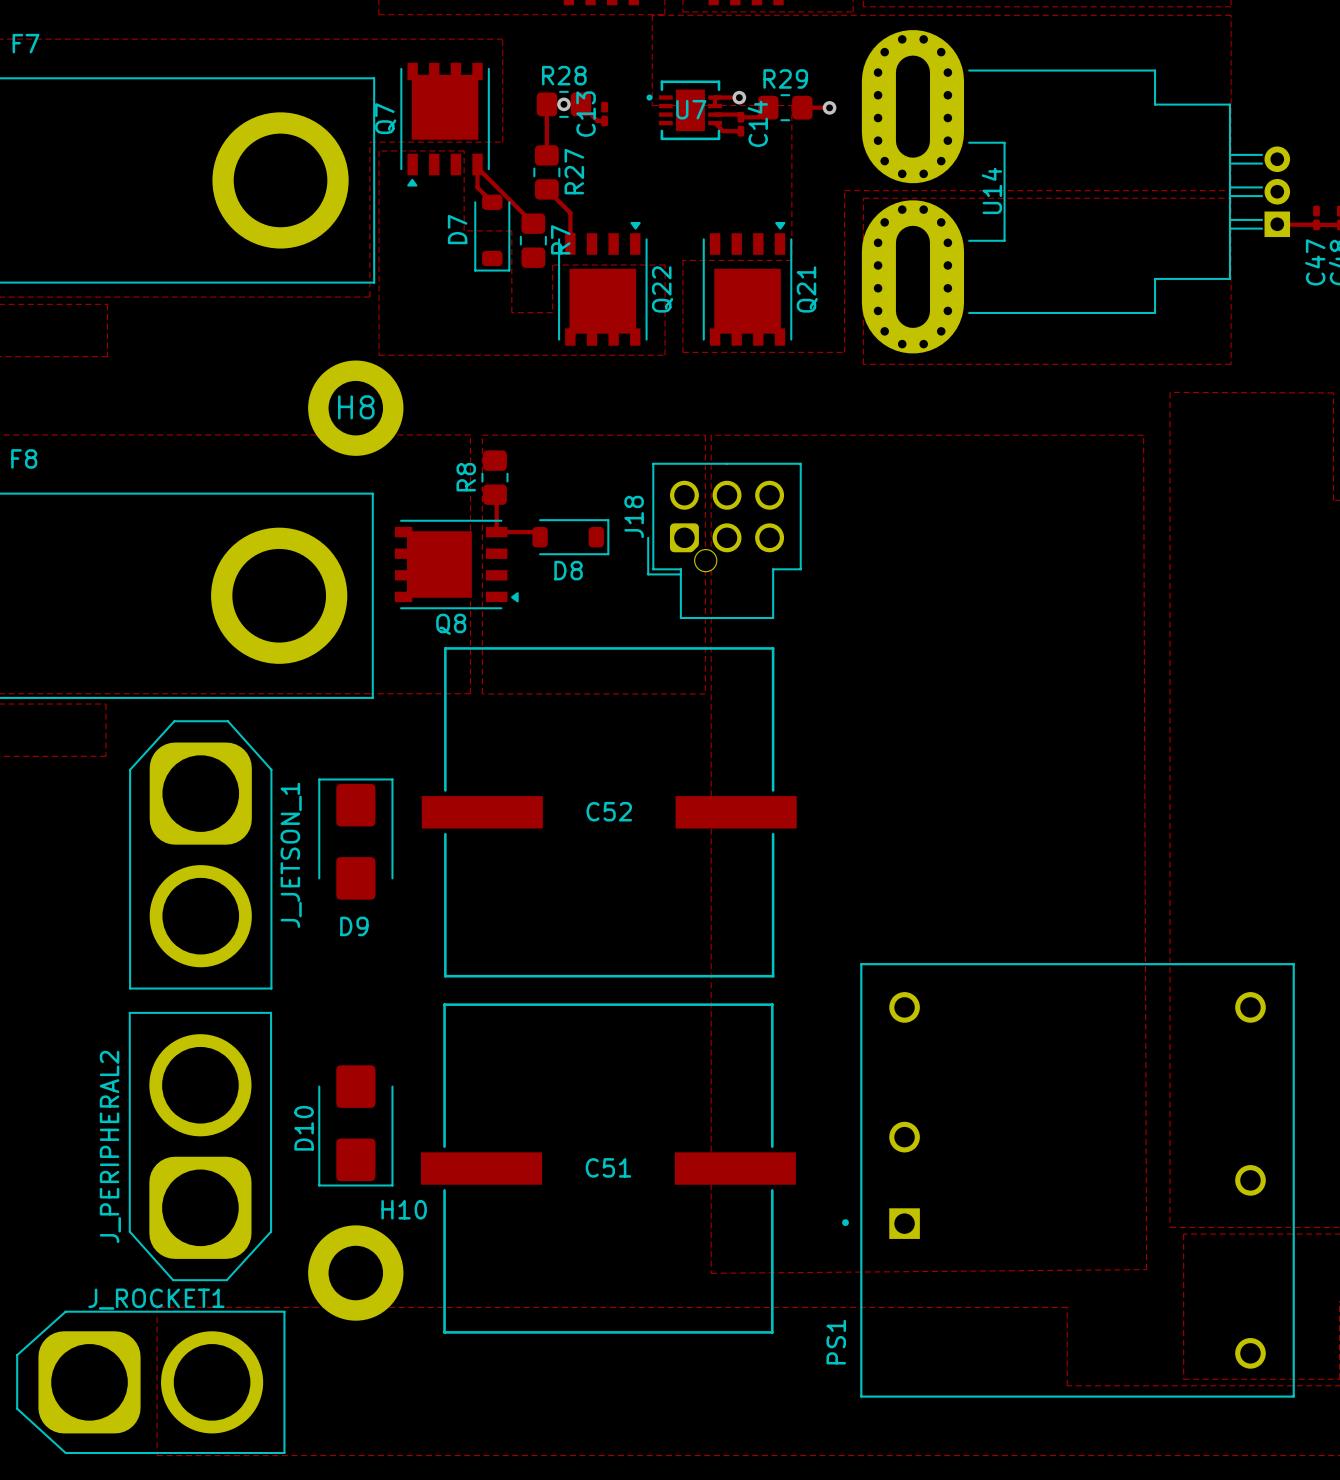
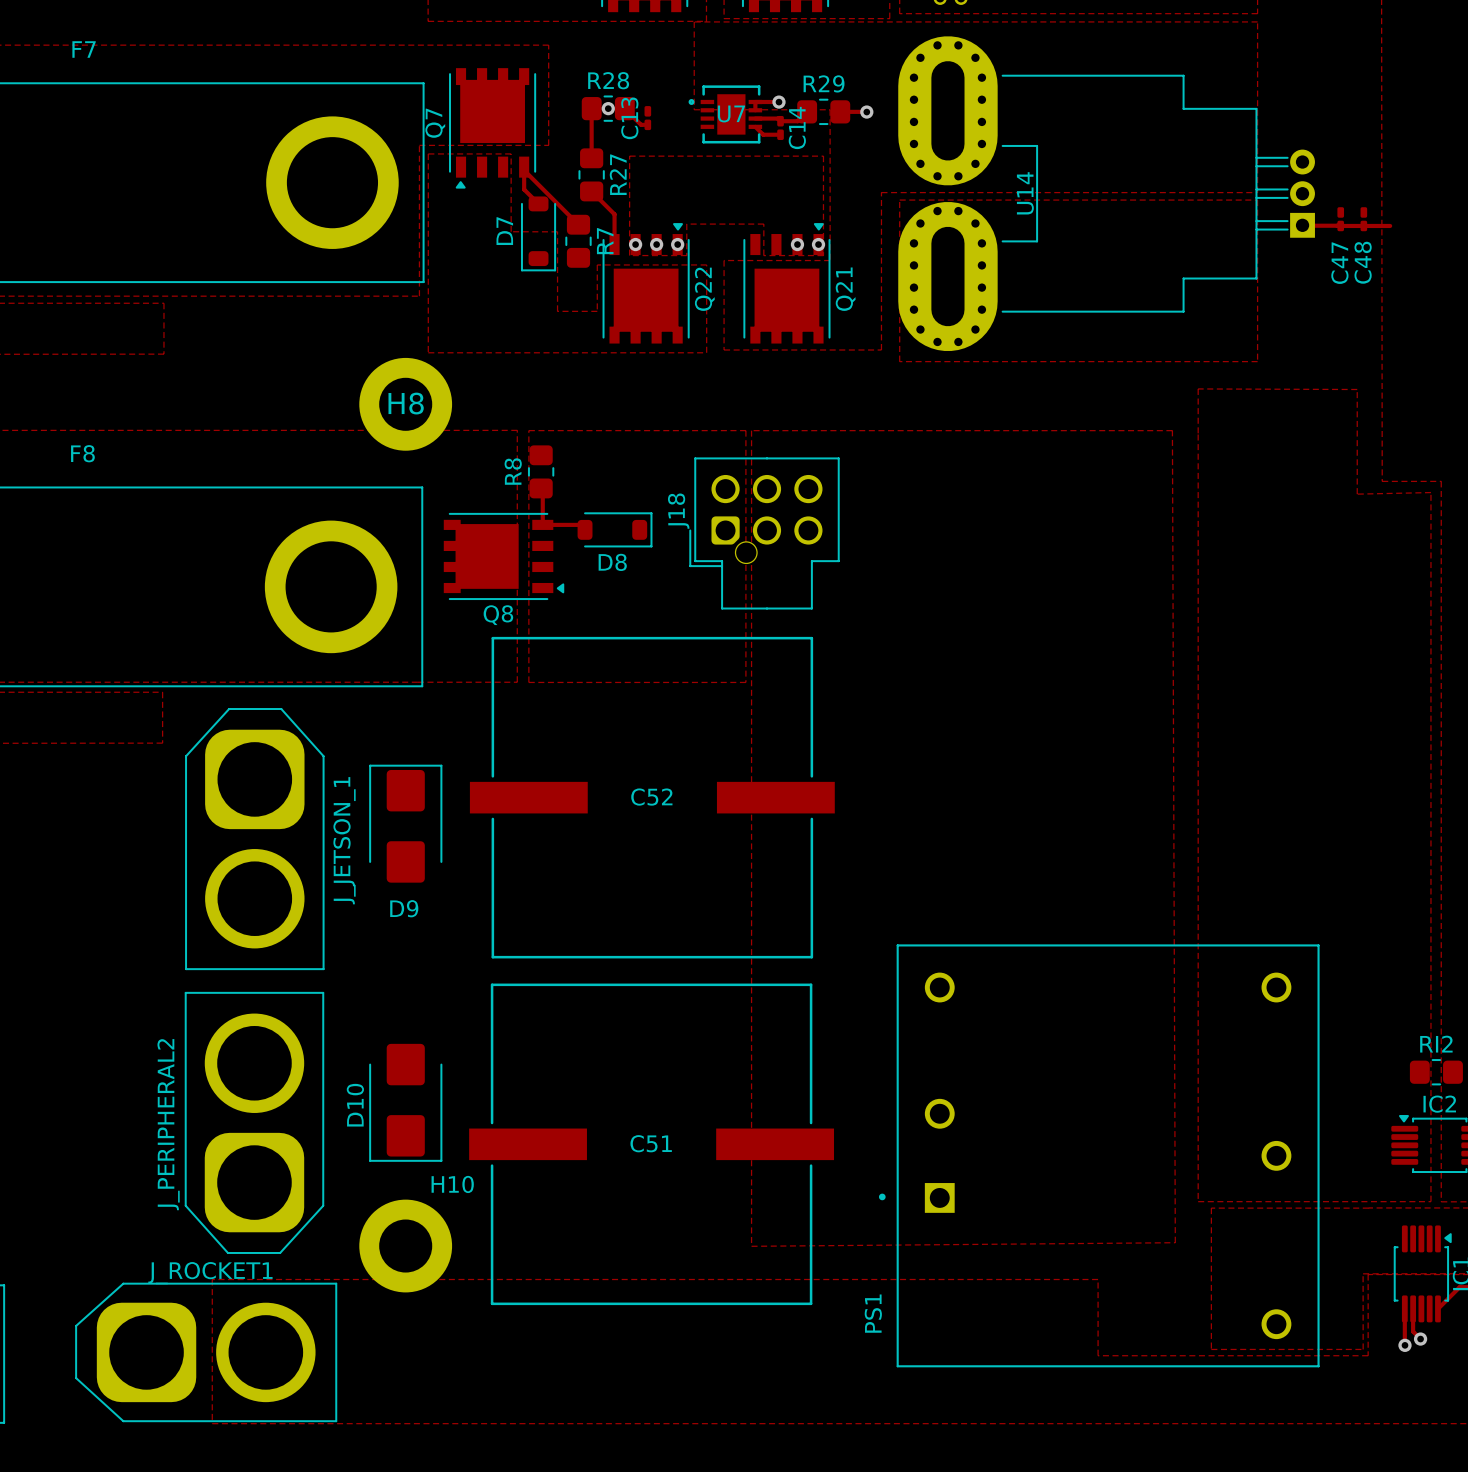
zone outline: none -> (629, 156) (629, 255) (686, 255) (686, 224) (763, 224) (763, 255) (823, 255) (823, 156) (629, 156)
via: none -> (635, 244)
via: none -> (656, 244)
via: none -> (677, 244)
via: none -> (797, 244)
via: none -> (818, 244)

